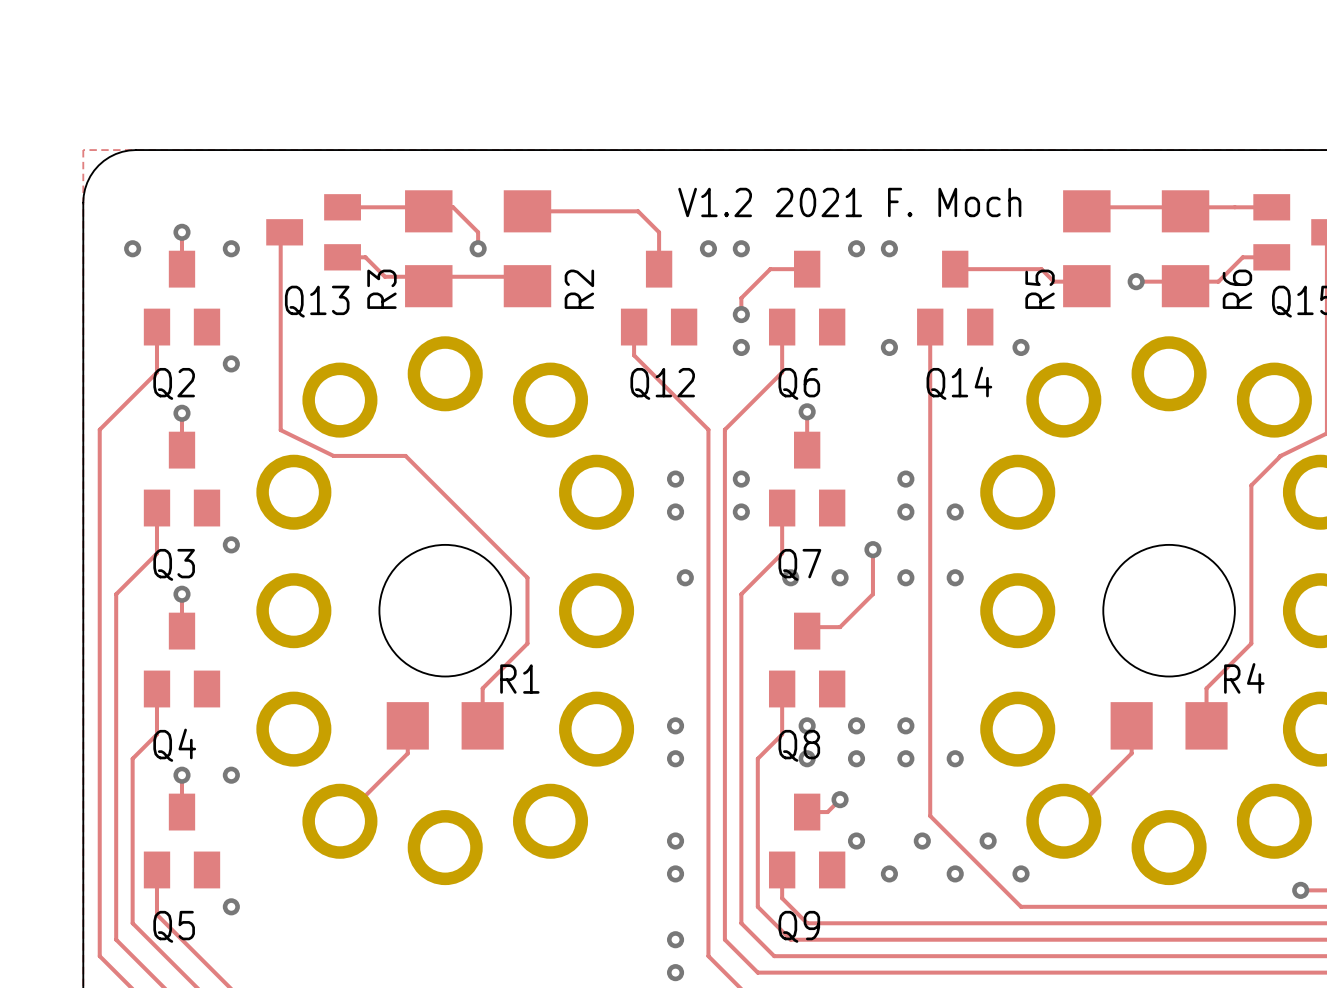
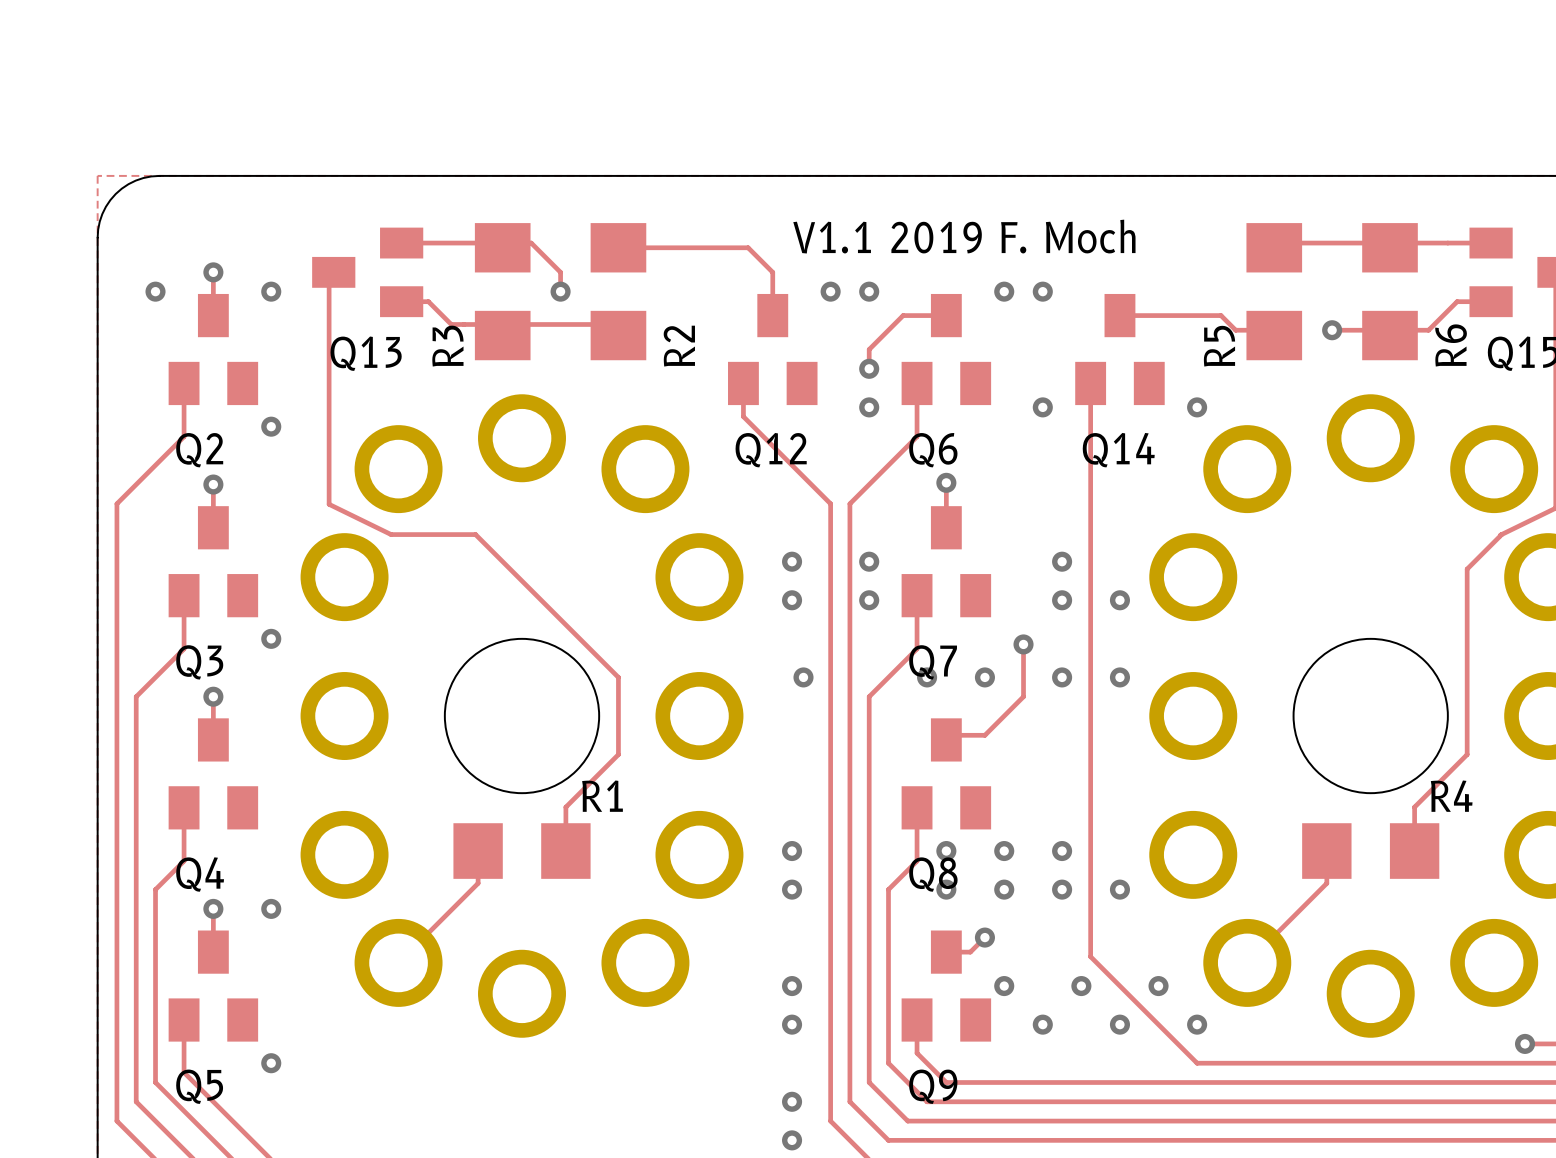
text: V1.2 2021 F. Moch (849, 202) -> V1.1 2019 F. Moch (964, 236)

